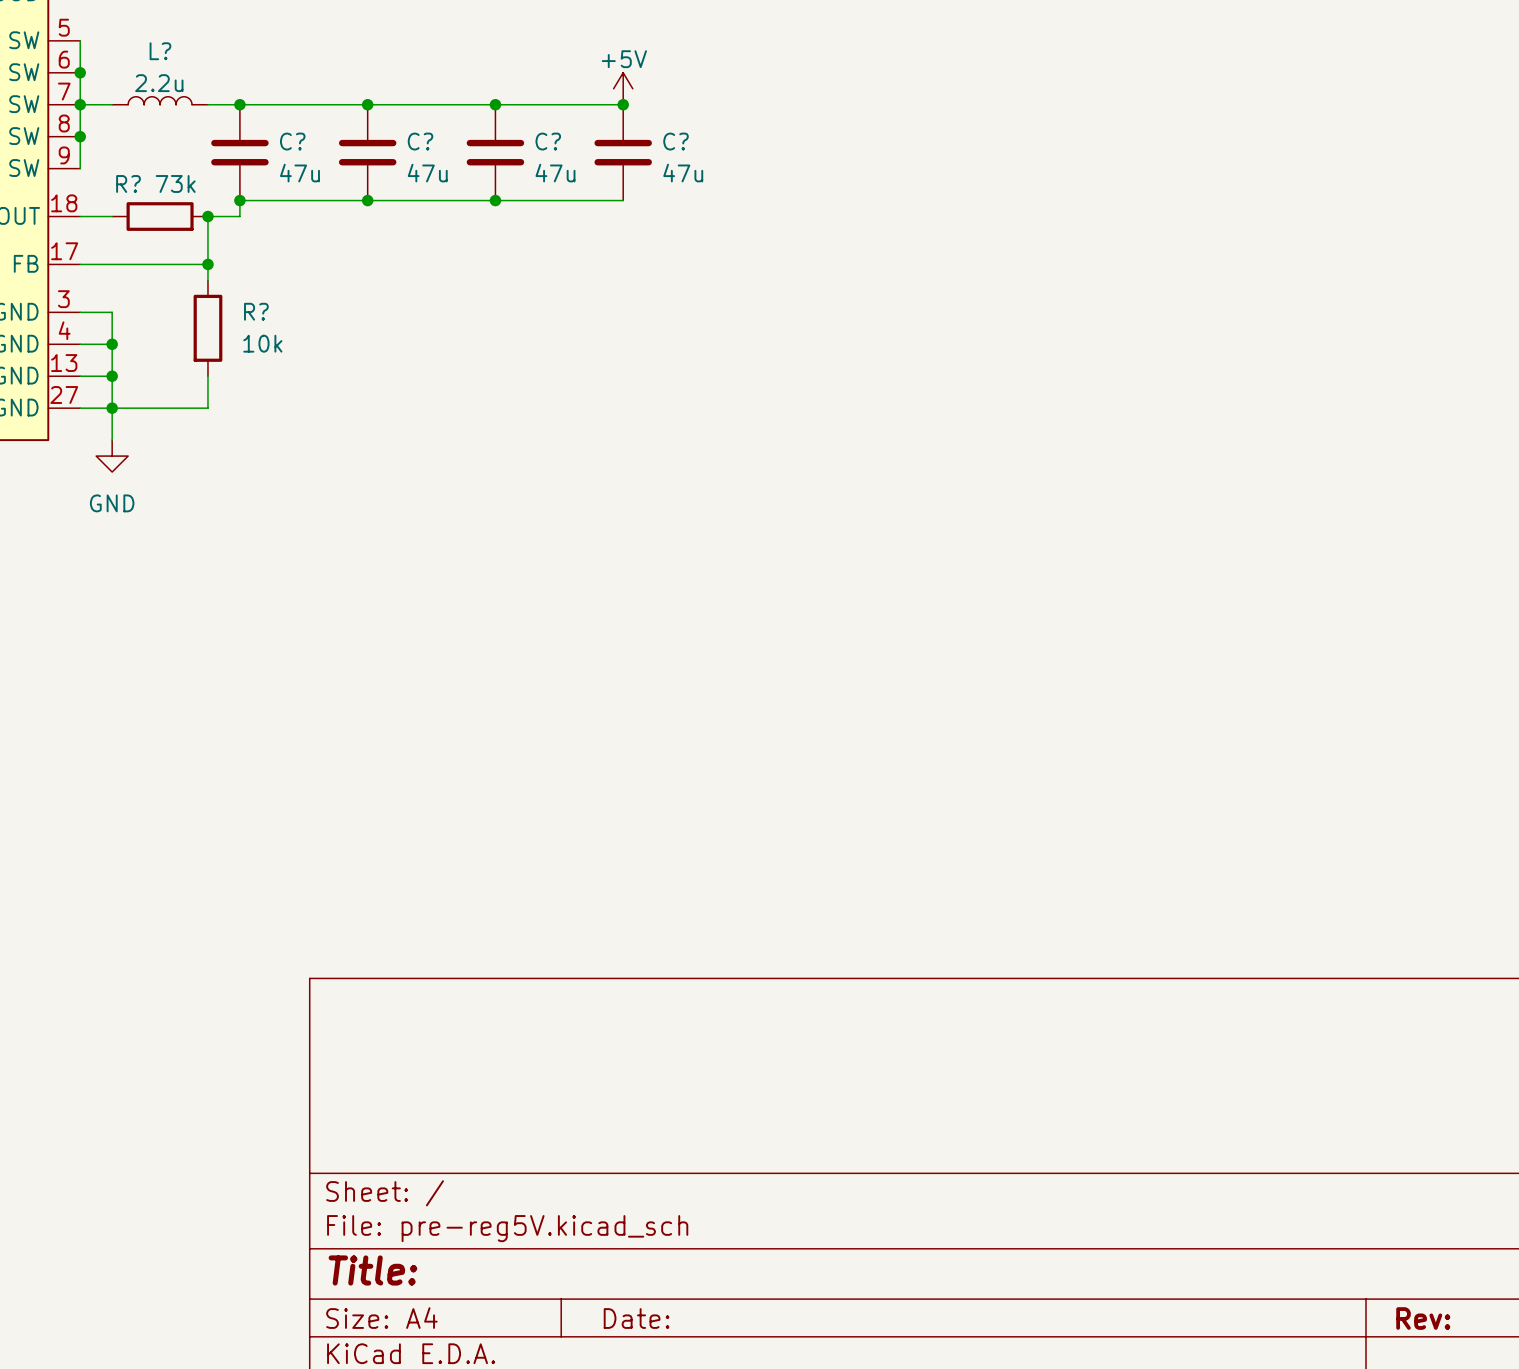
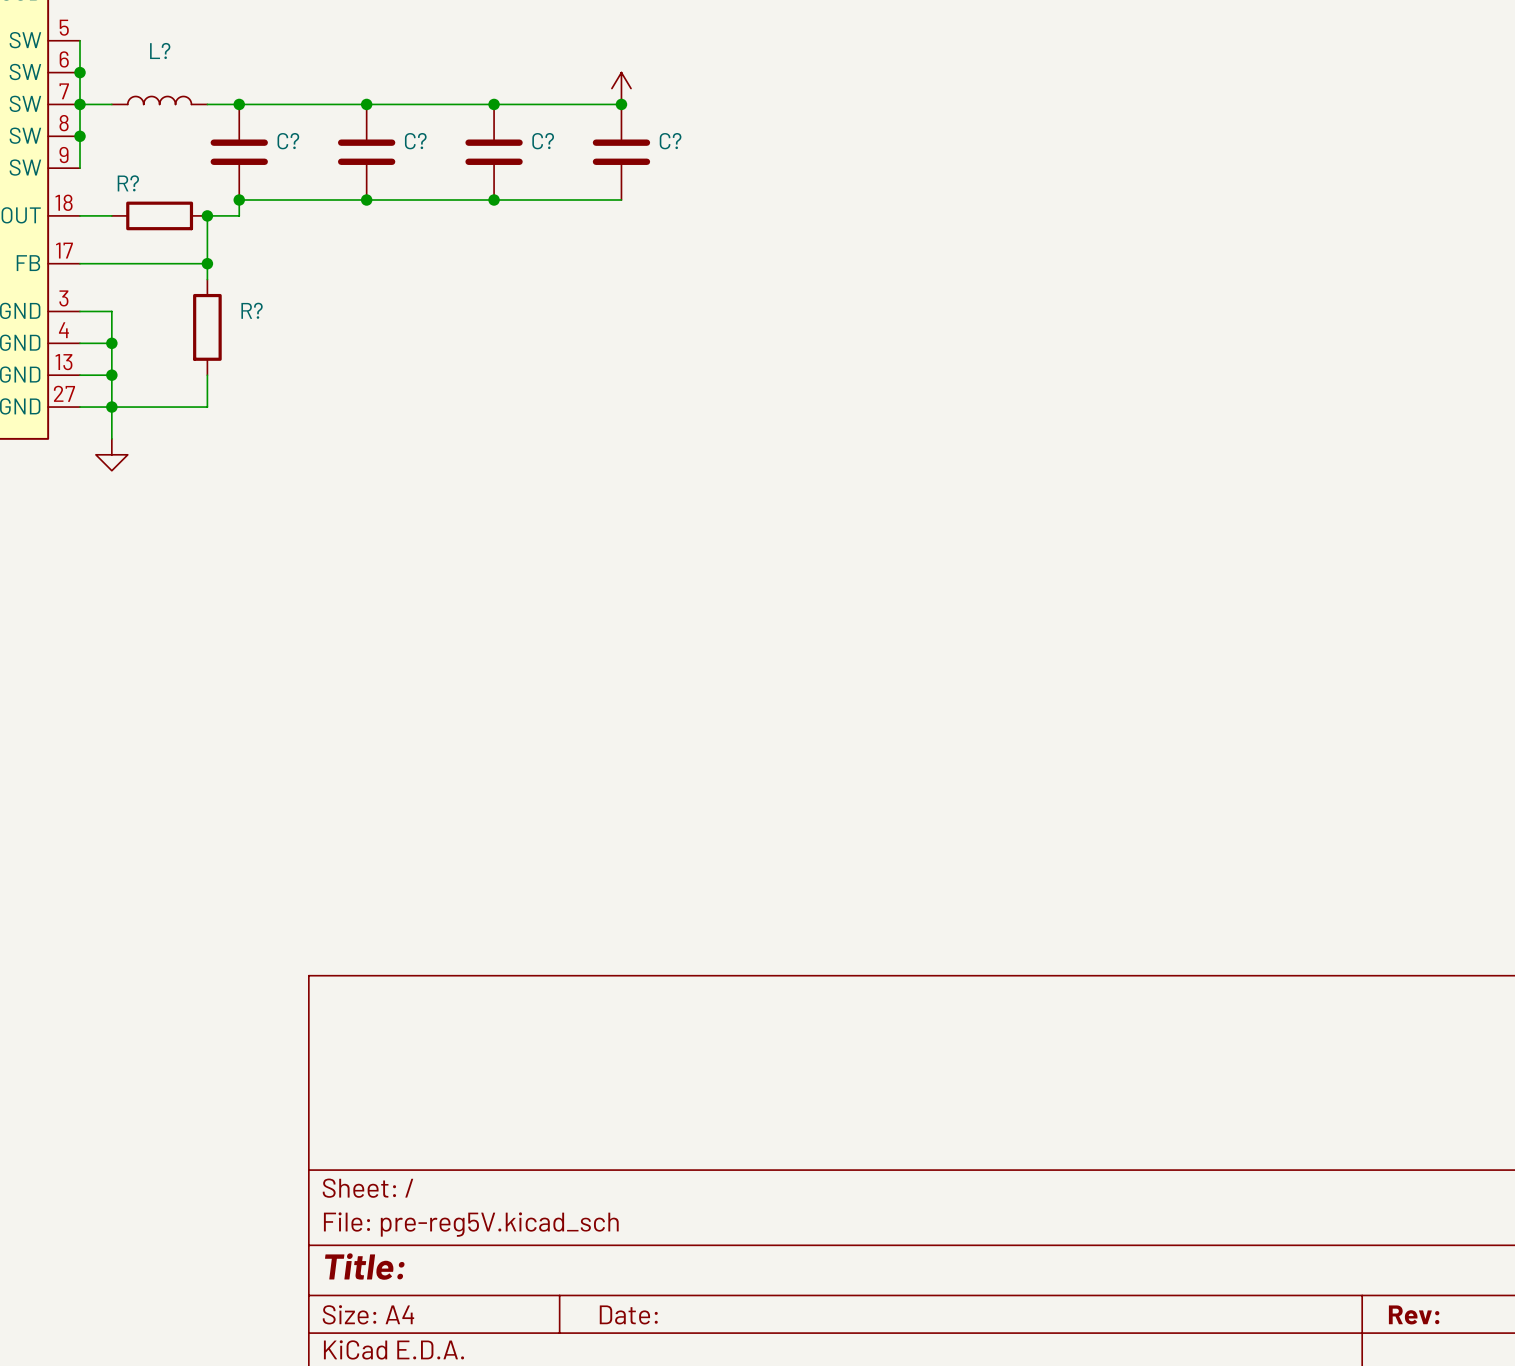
power symbol text: +5V (624, 59) -> none
L? value: 2.2u (159, 83) -> none
C? value: 47u (299, 173) -> none
C? value: 47u (427, 173) -> none
C? value: 47u (555, 173) -> none
C? value: 47u (683, 173) -> none
R? value: 73k (175, 183) -> none
R? value: 10k (262, 343) -> none
power symbol text: GND (112, 503) -> none

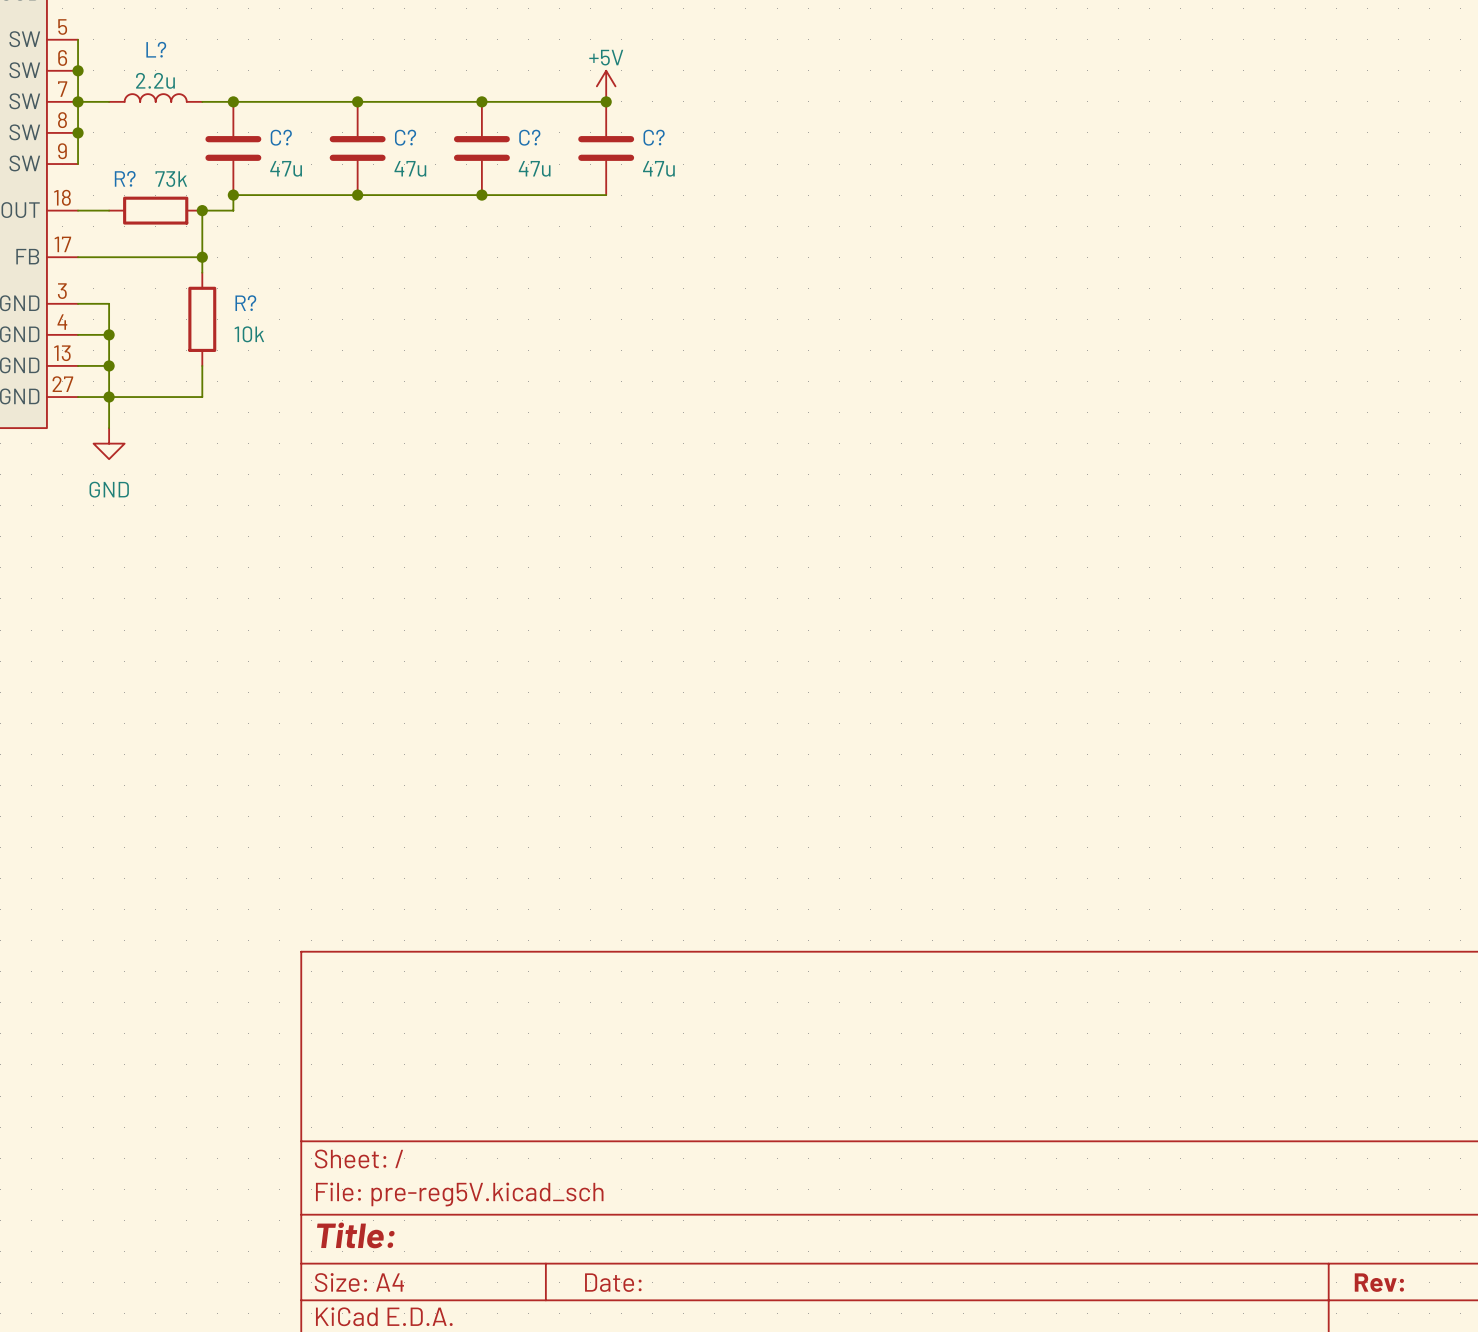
power symbol text: none -> +5V (606, 57)
L? value: none -> 2.2u (155, 80)
C? value: none -> 47u (286, 168)
C? value: none -> 47u (410, 168)
C? value: none -> 47u (534, 168)
C? value: none -> 47u (658, 168)
R? value: none -> 73k (171, 179)
R? value: none -> 10k (249, 334)
power symbol text: none -> GND (109, 489)

